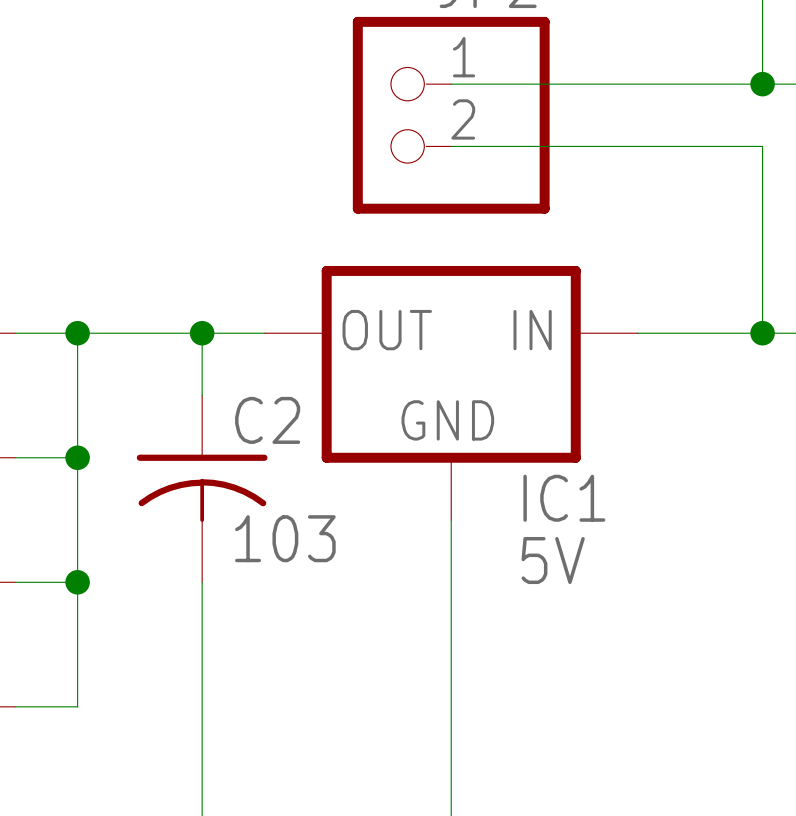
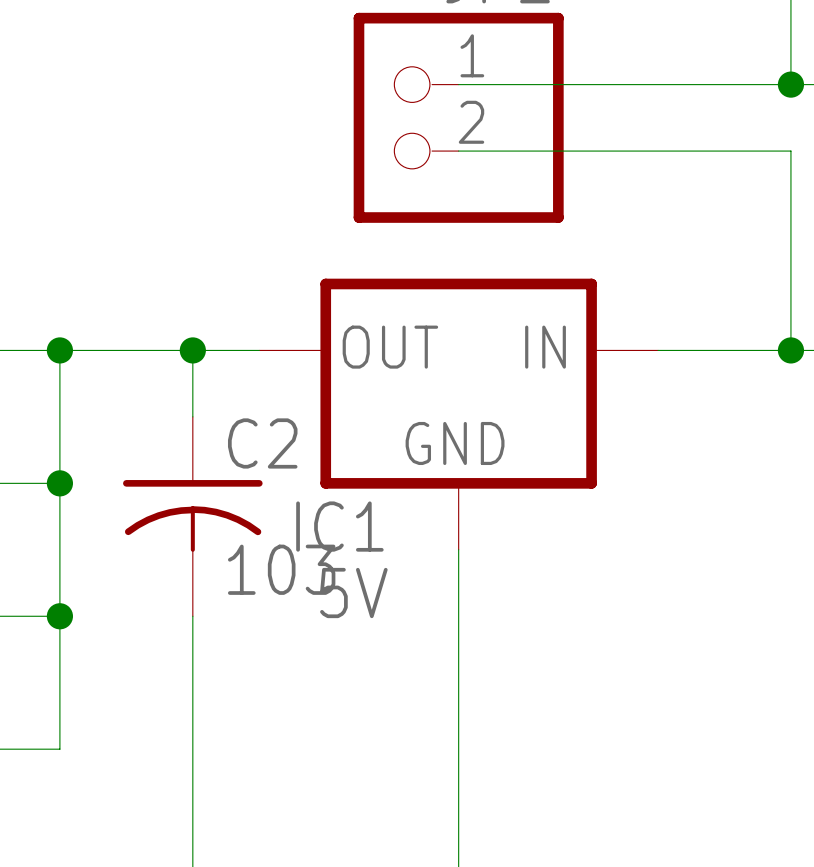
IC1 name position: IC1 (564, 498) -> IC1 (339, 526)
IC1 value position: 5V (553, 560) -> 5V (353, 593)

